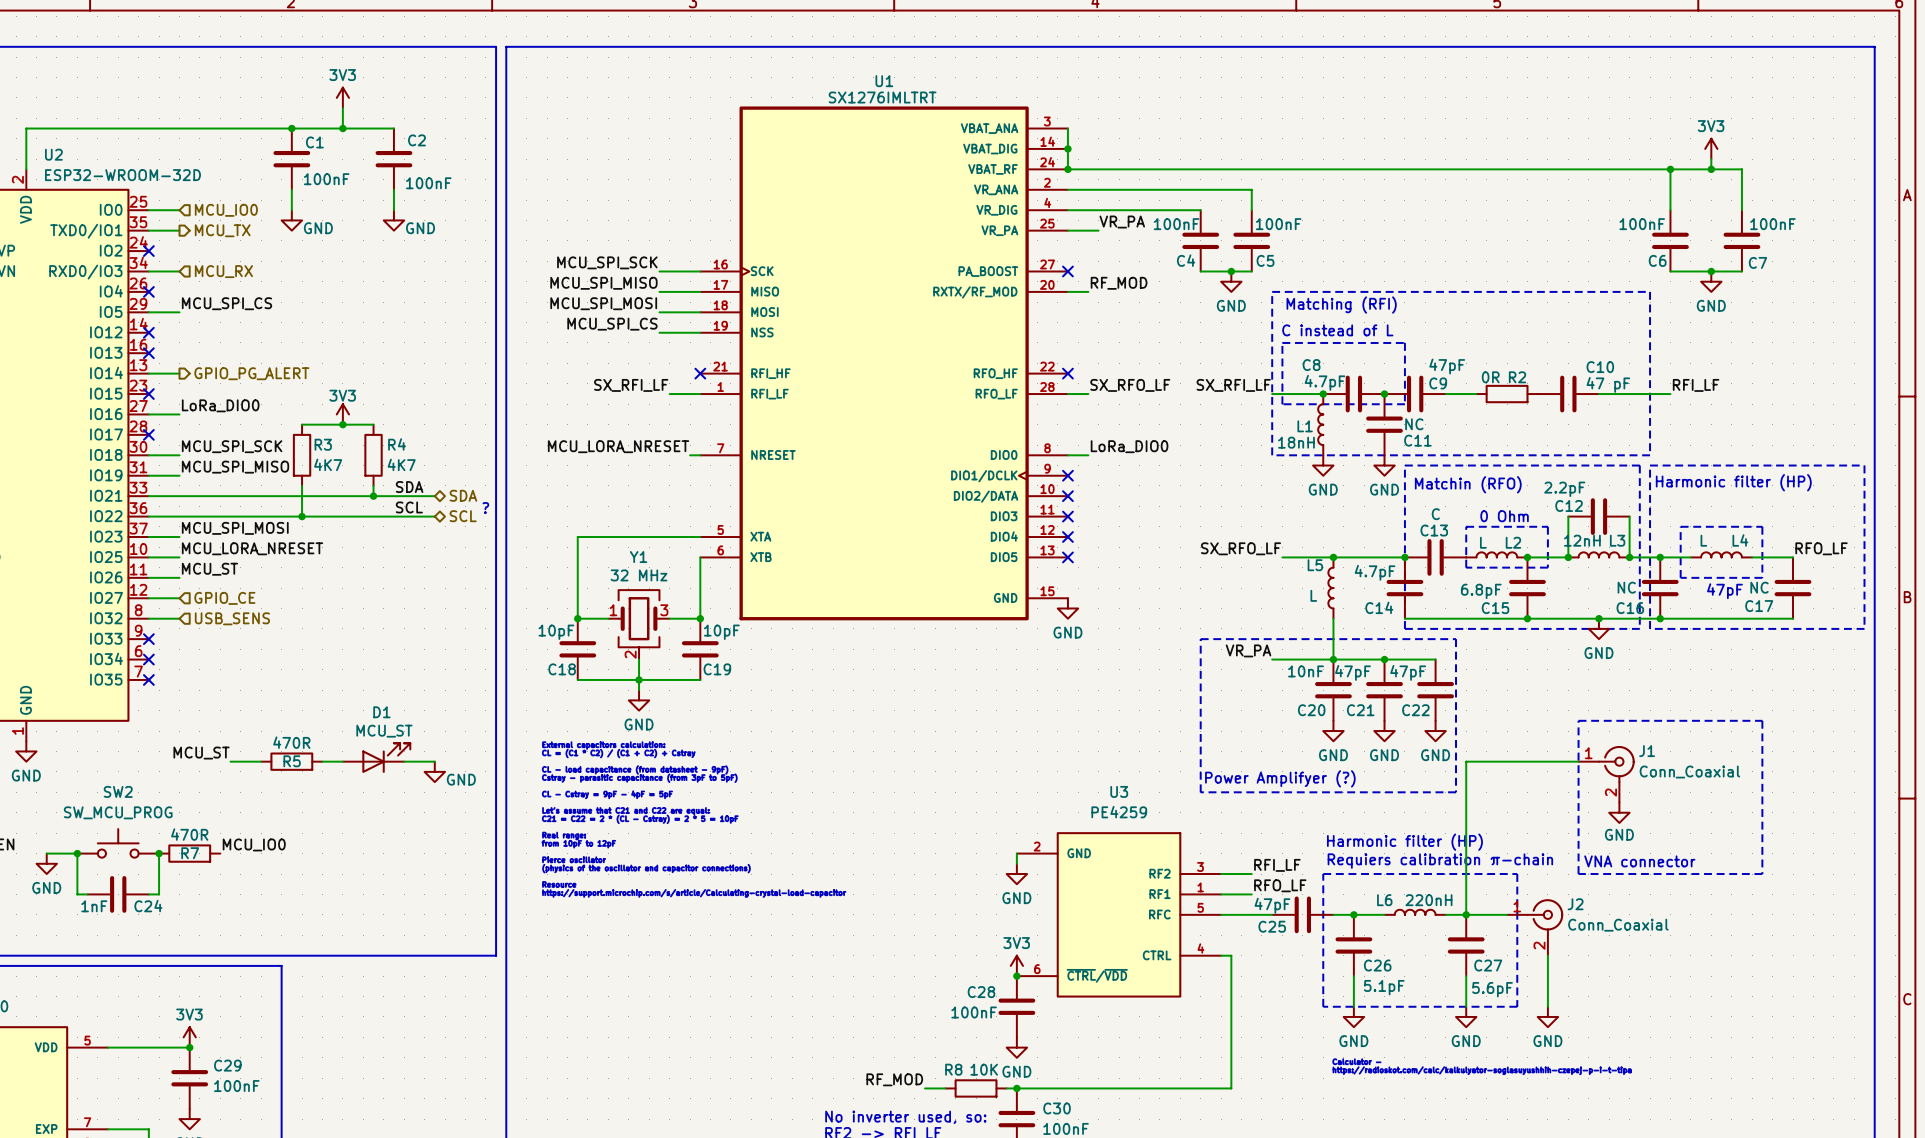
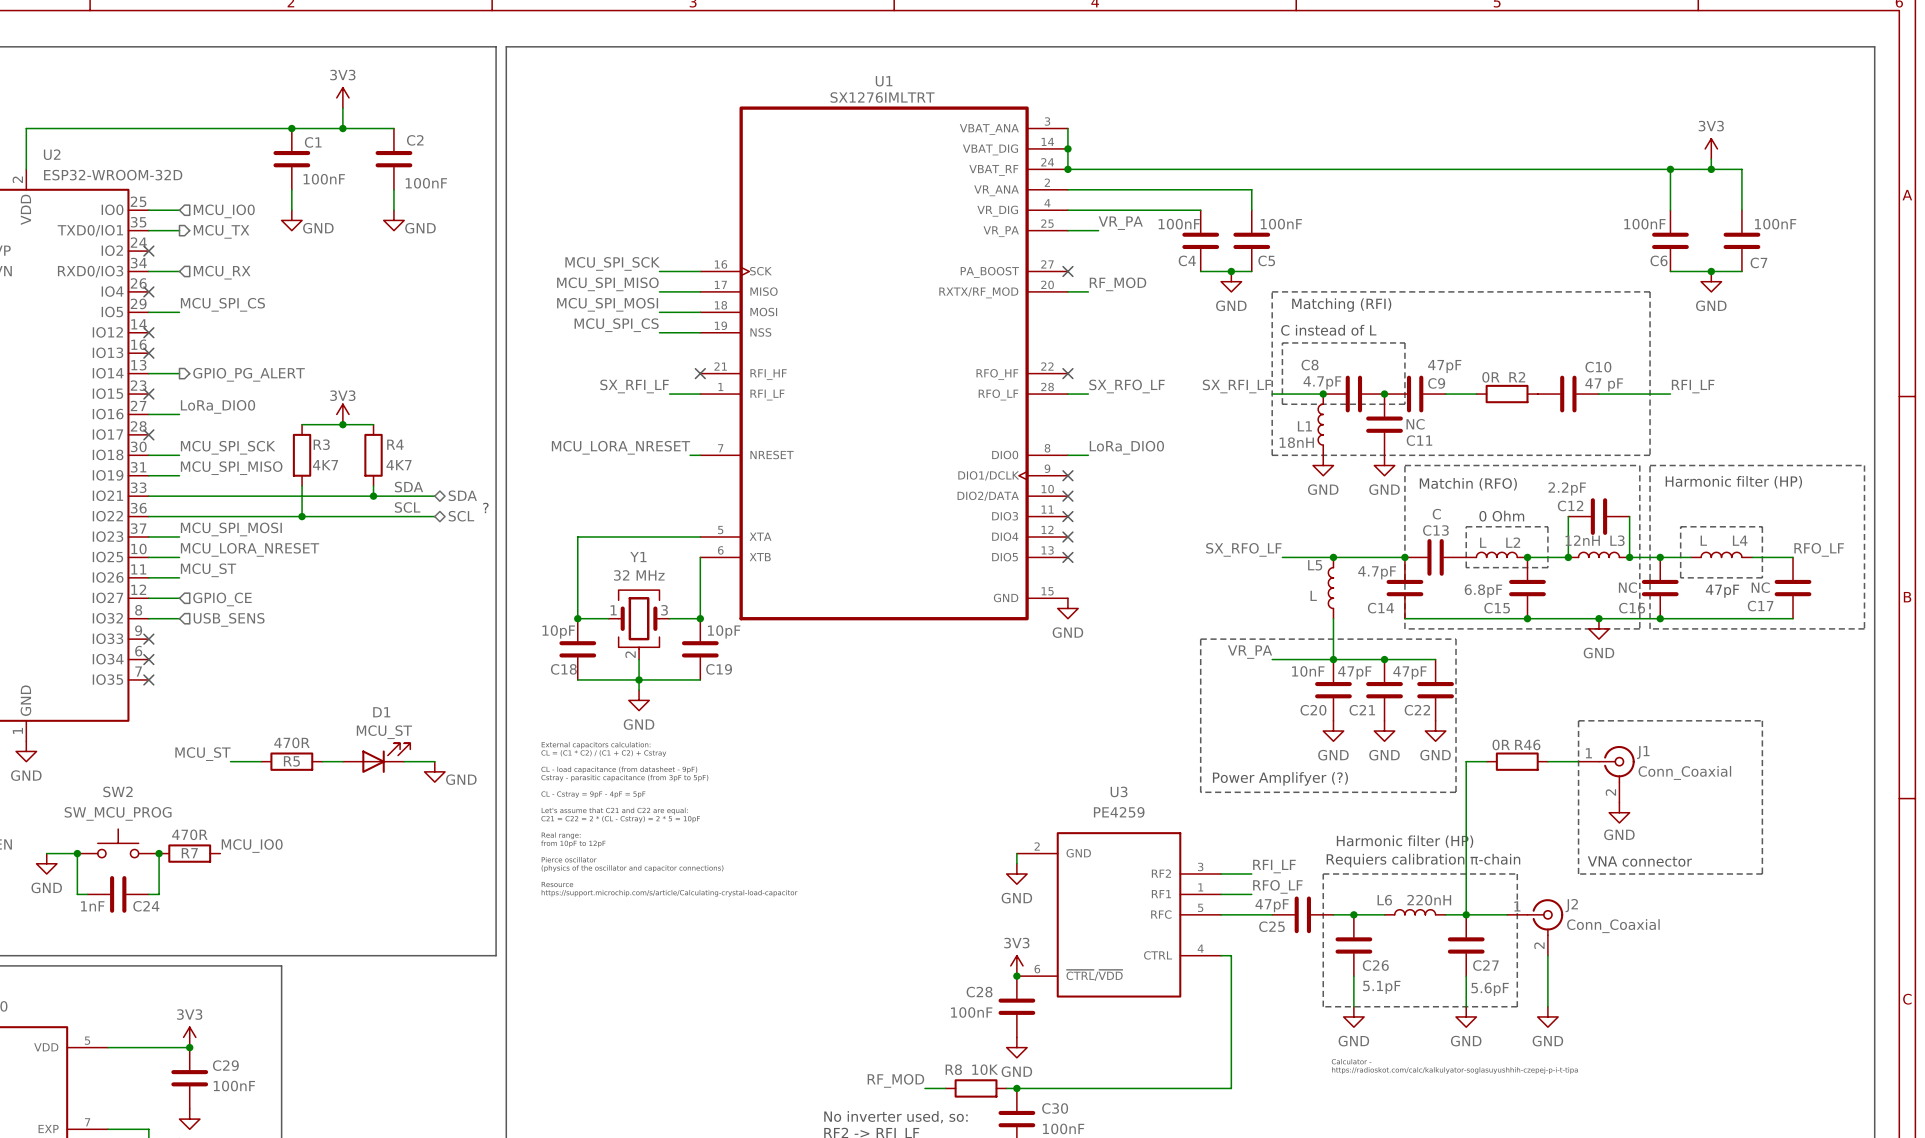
wire: (1486, 761) (1547, 761) -> none
R46: none -> 0R (1517, 761)

